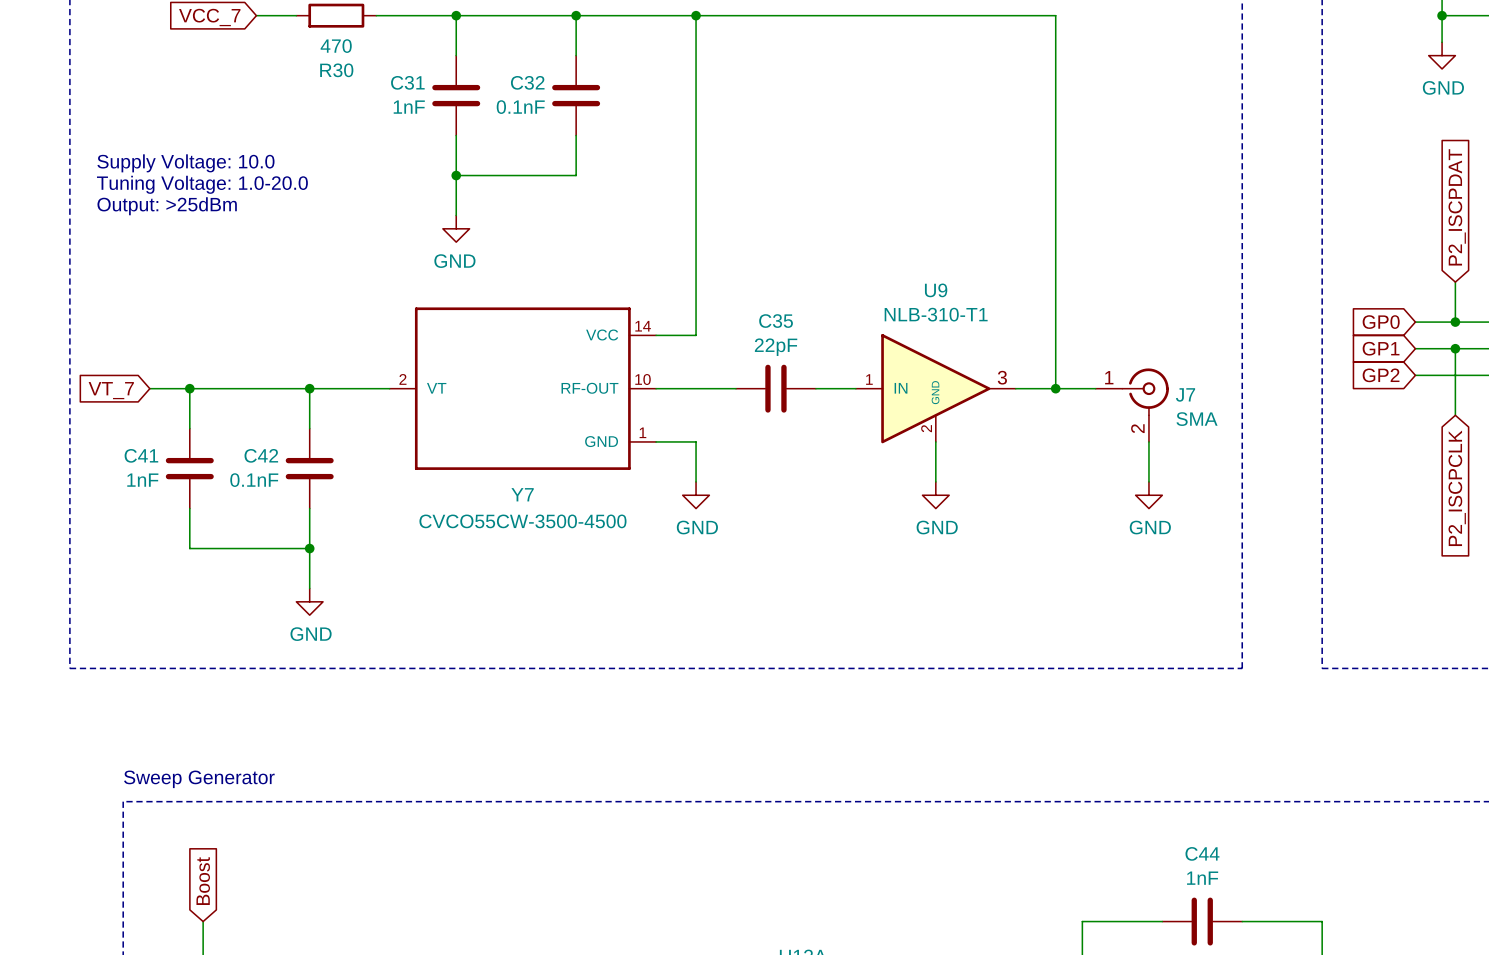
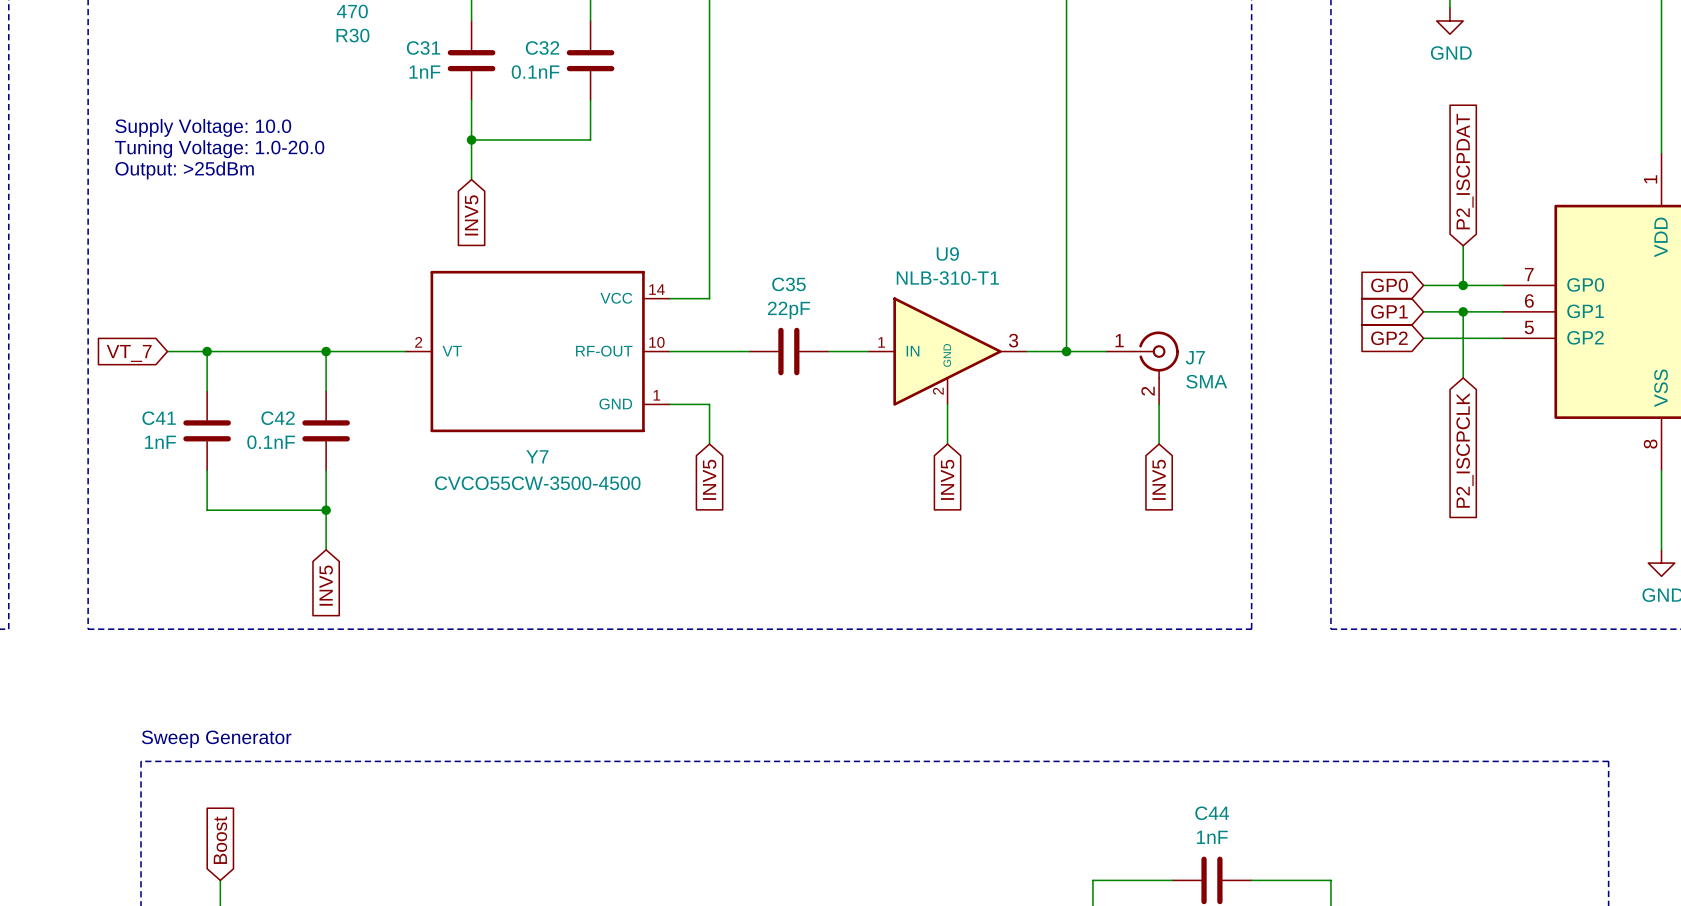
power symbol: GND (456, 228) -> none
global label: none -> INV5 (471, 215)
power symbol: GND (696, 495) -> none
power symbol: GND (935, 495) -> none
power symbol: GND (1148, 495) -> none
global label: none -> INV5 (709, 479)
global label: none -> INV5 (947, 479)
global label: none -> INV5 (1159, 479)
power symbol: GND (309, 601) -> none
global label: none -> INV5 (326, 585)

